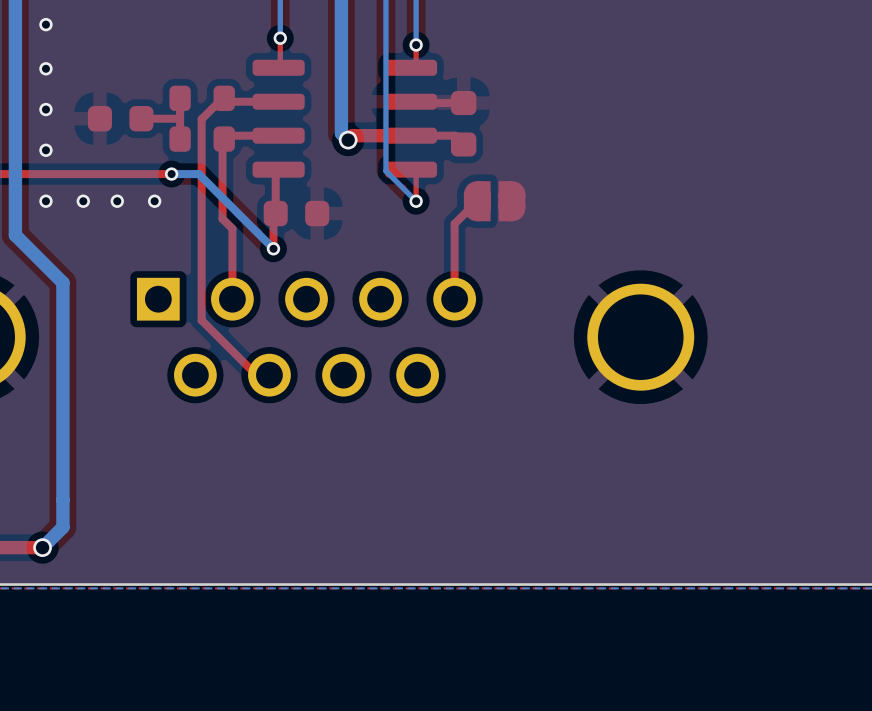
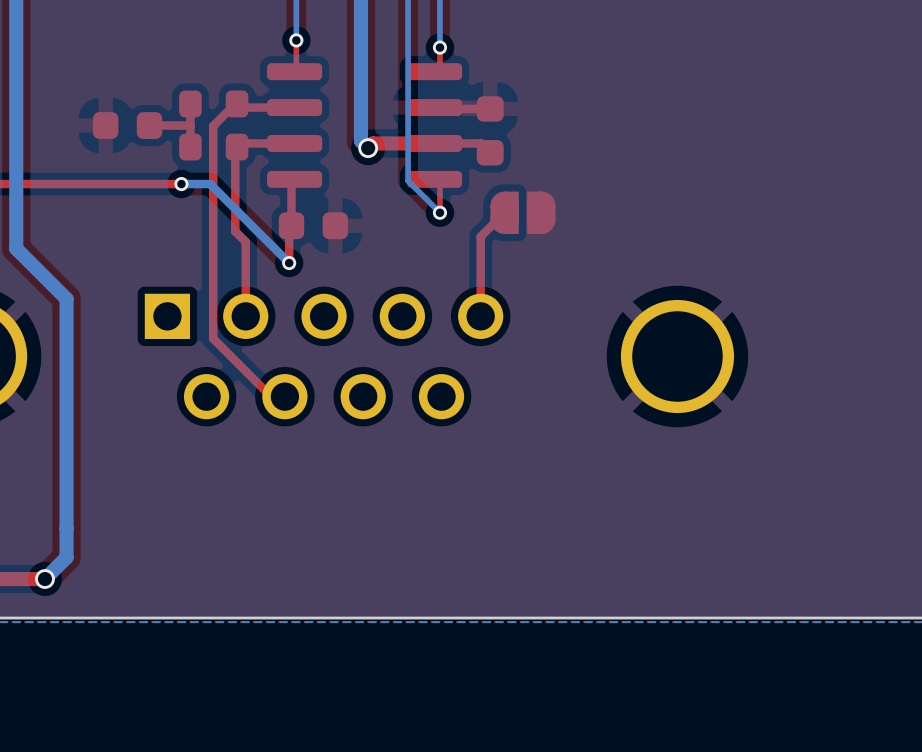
via: (45, 24) -> none
via: (45, 68) -> none
via: (45, 109) -> none
via: (45, 150) -> none
via: (45, 201) -> none
via: (83, 201) -> none
via: (117, 201) -> none
via: (154, 201) -> none

